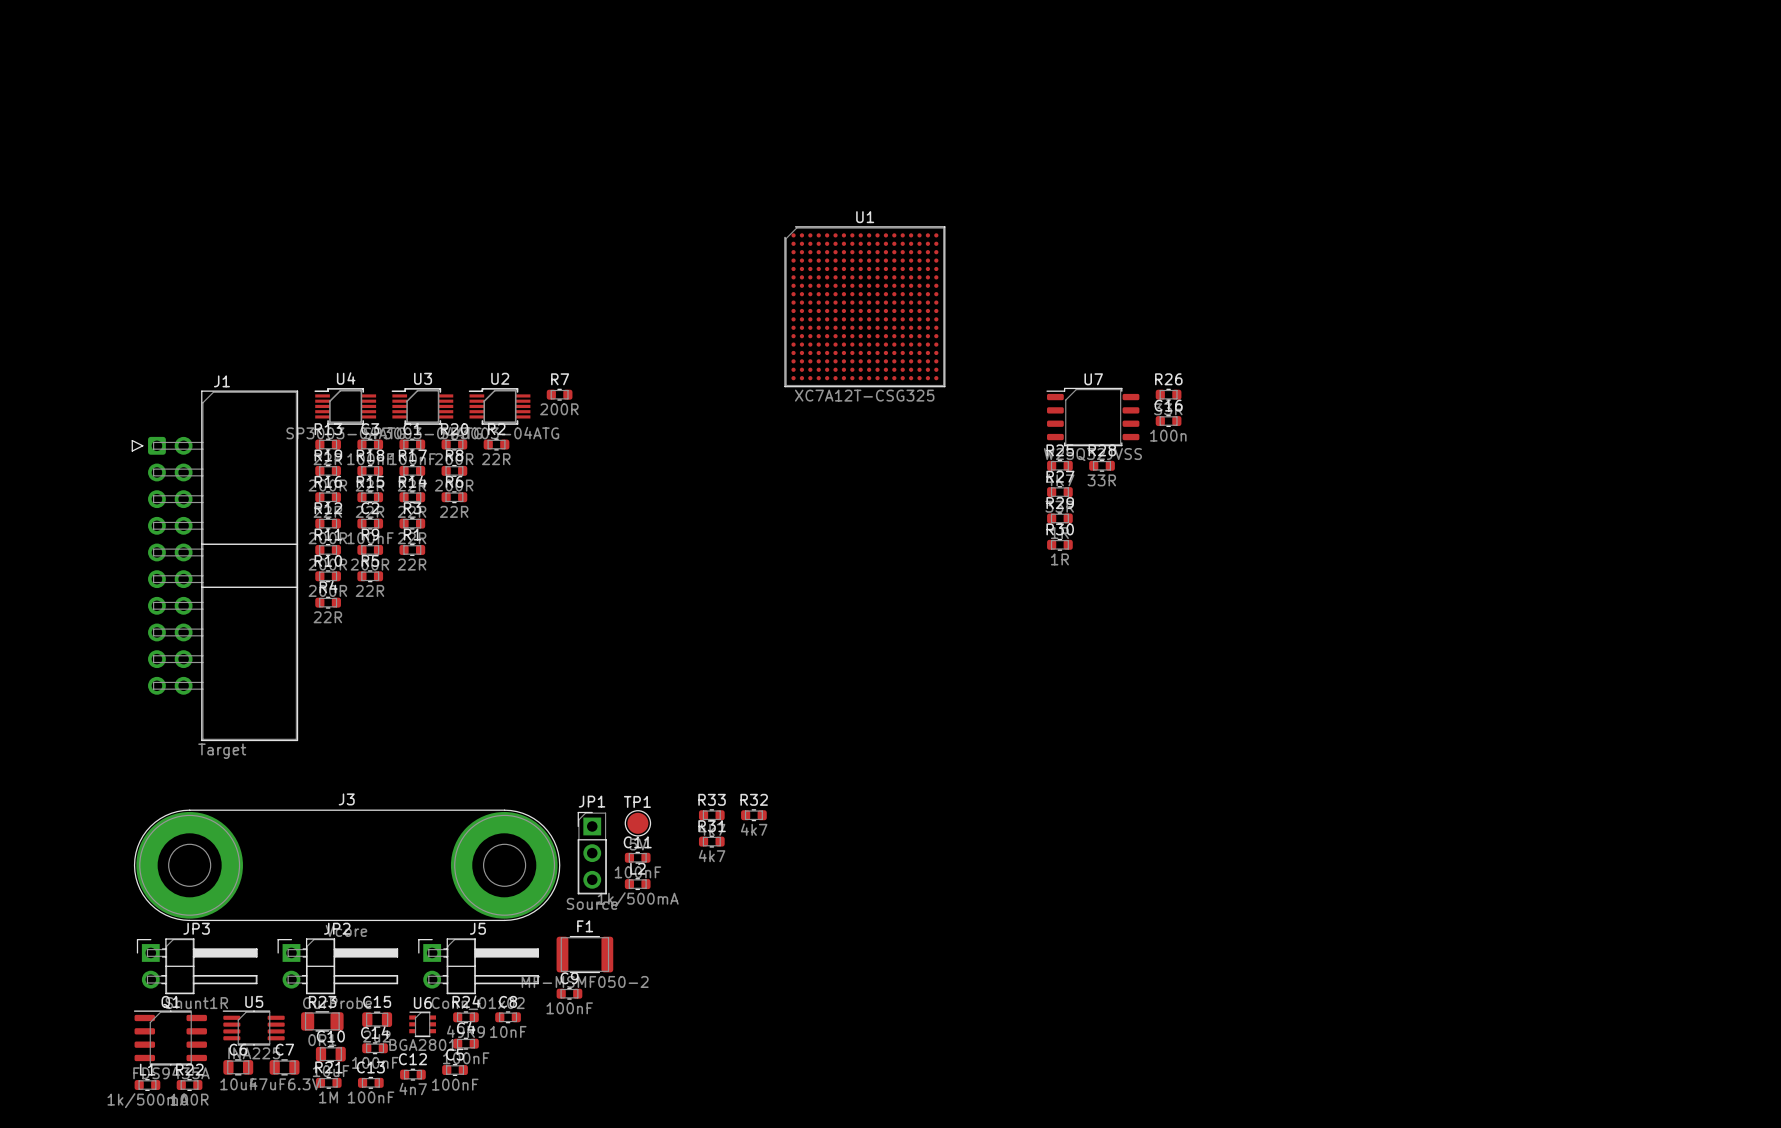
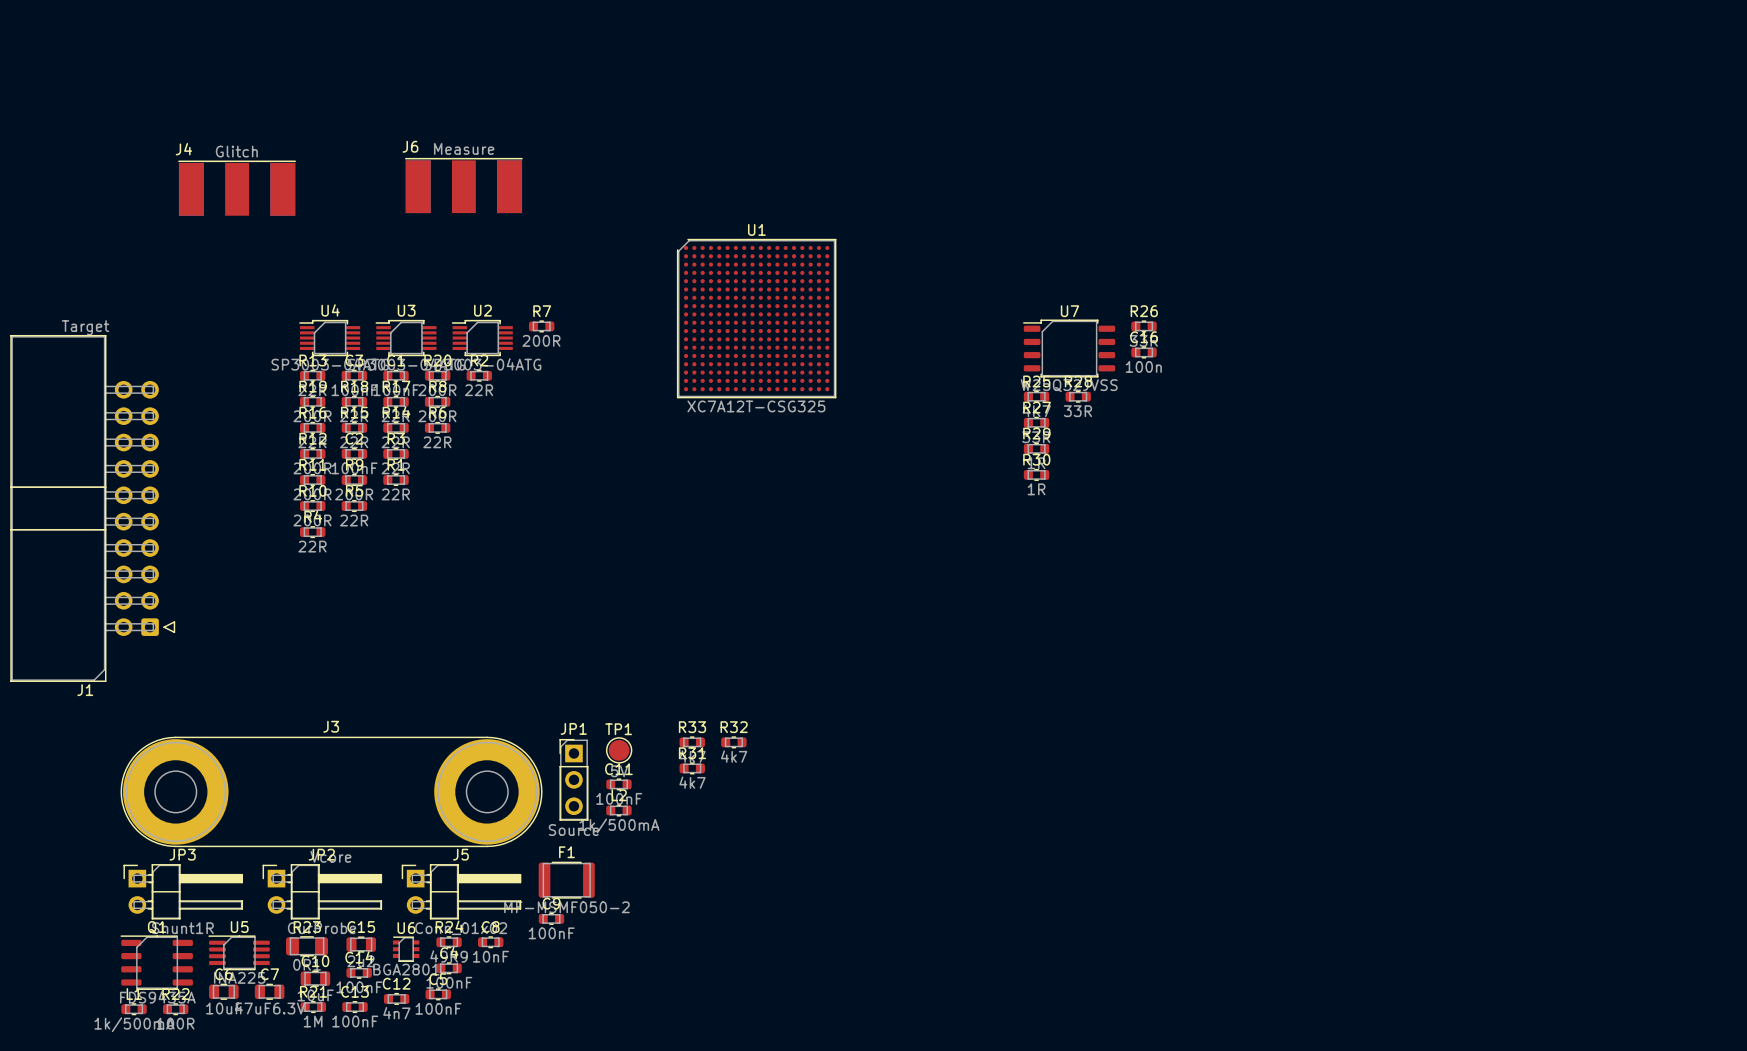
J6: none -> Measure (463, 185)
J4: none -> Glitch (237, 188)
U1 position: (864, 306) -> (756, 318)
J1 rotation: 0° (214, 565) -> 180° (92, 508)

